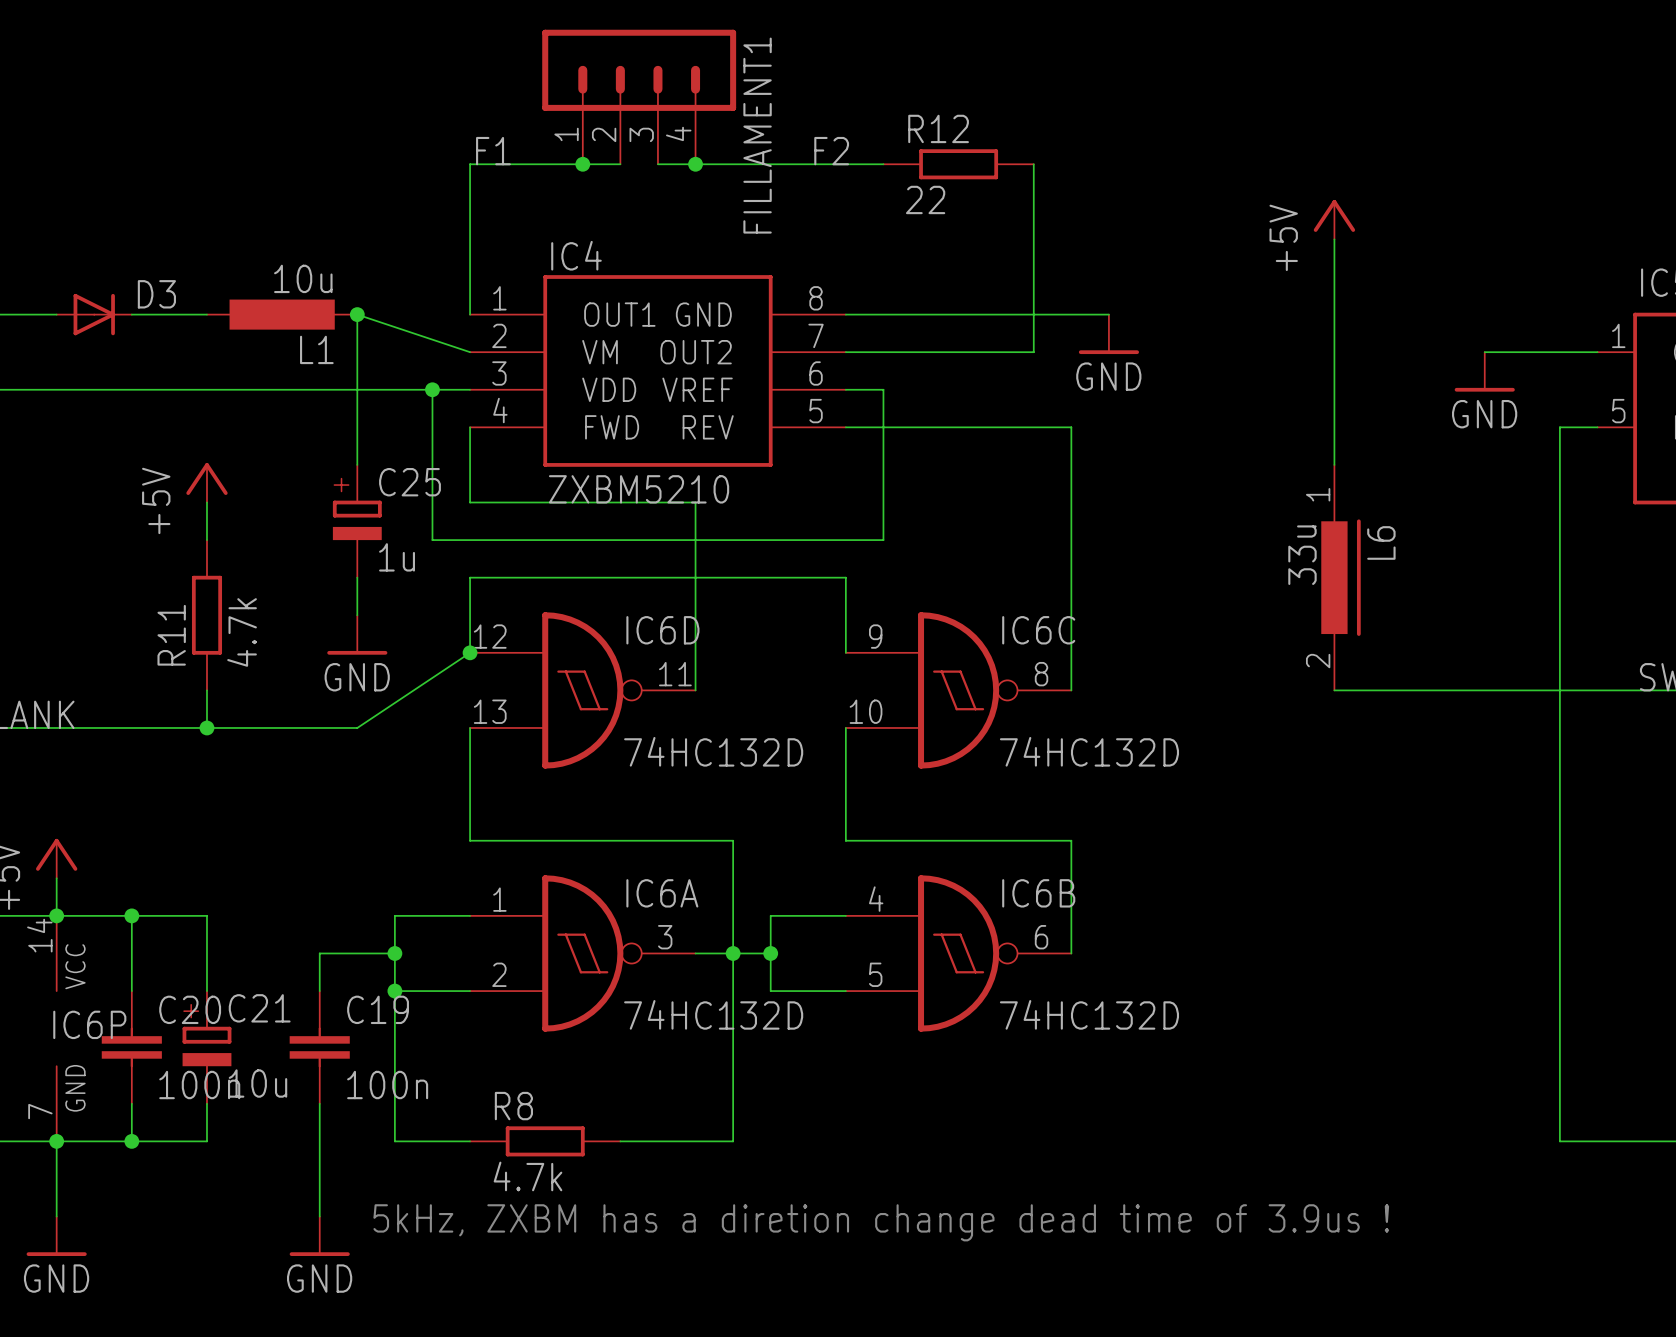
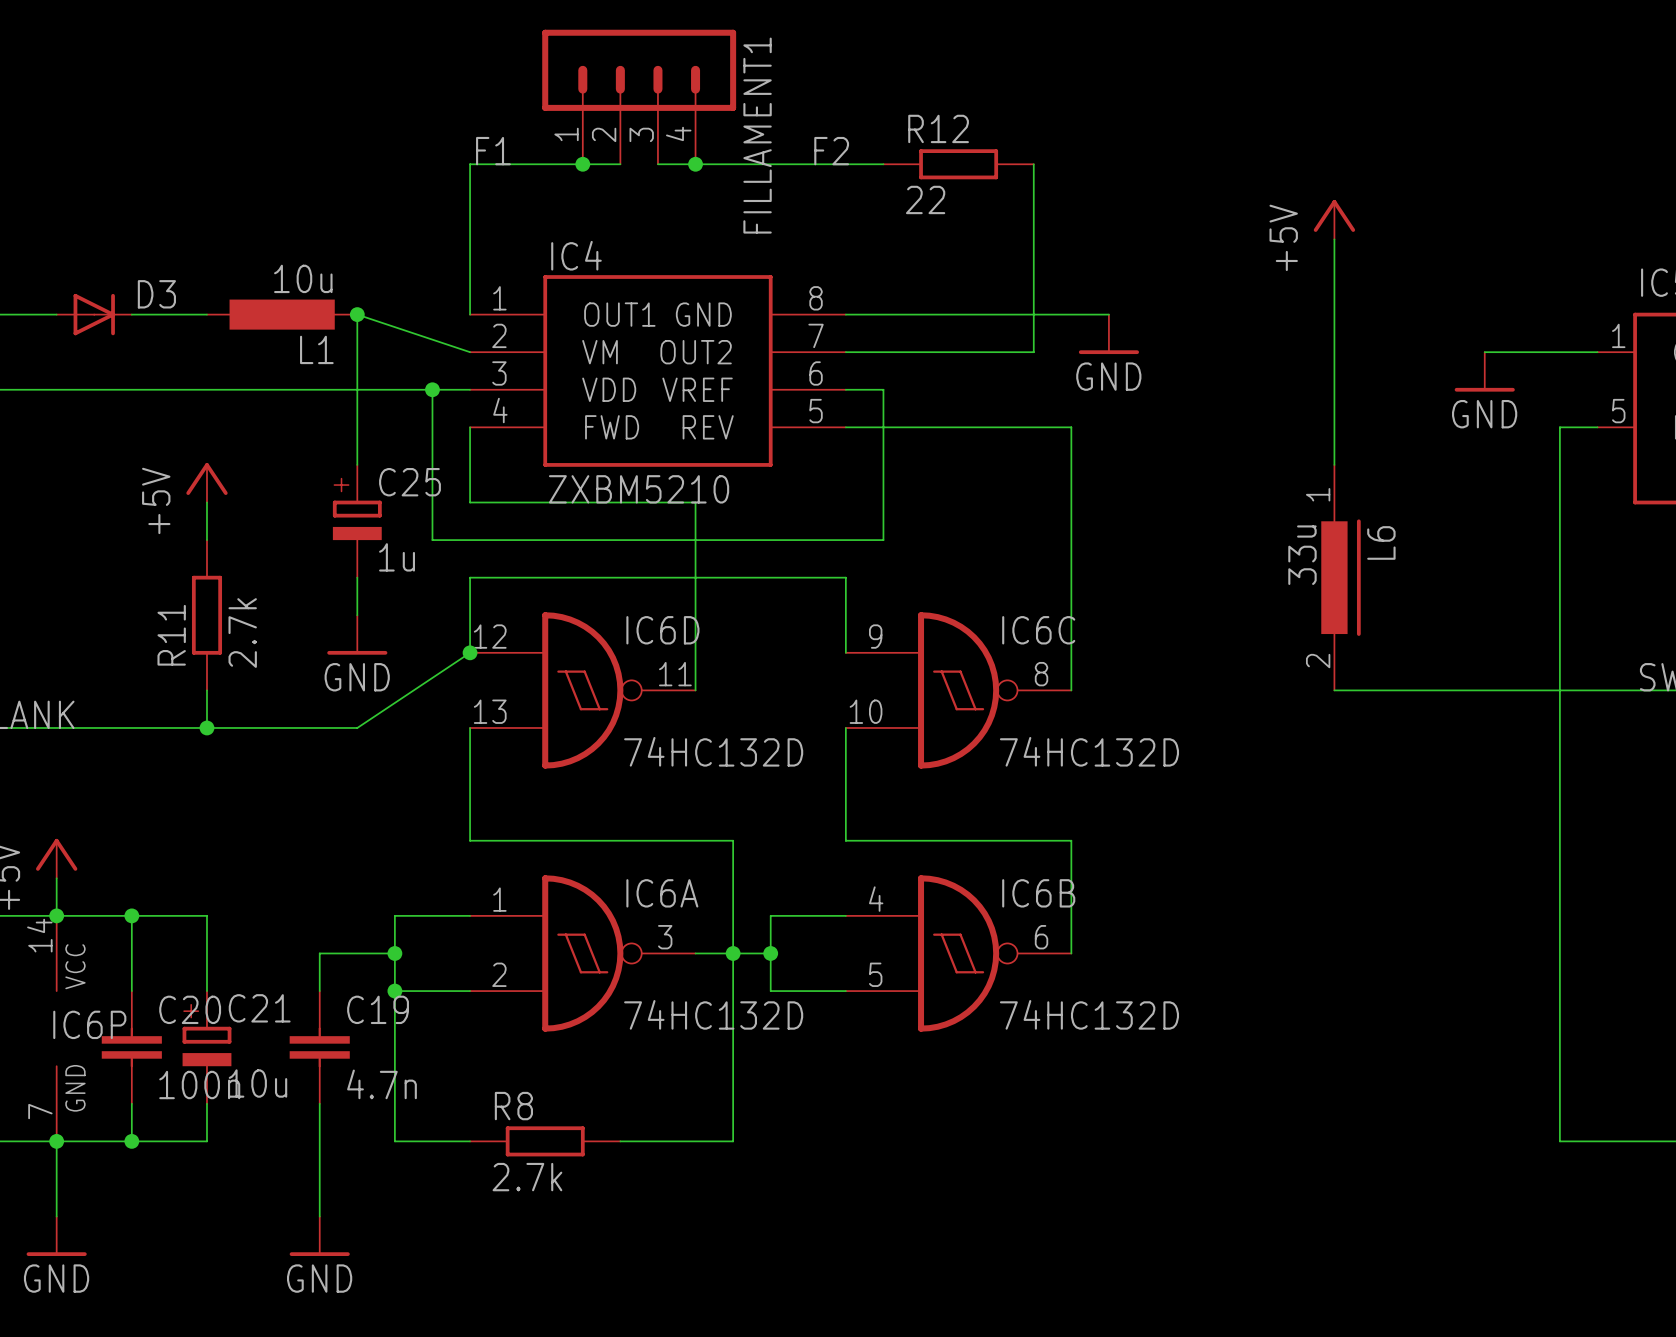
R11 value: 4.7k (242, 632) -> 2.7k (242, 633)
C19 value: 100n (387, 1085) -> 4.7n (382, 1084)
R8 value: 4.7k (528, 1176) -> 2.7k (527, 1177)
text: 5kHz, ZXBM has a diretion change dead time of 3.9us ! (881, 1222) -> none

